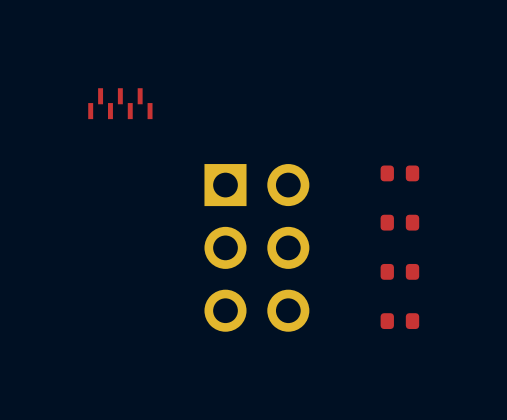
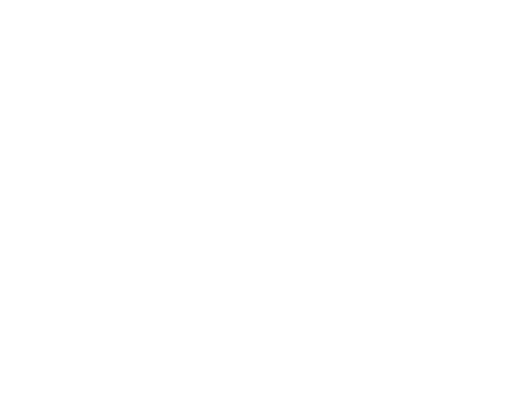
part: (120, 103) -> none
part: (399, 173) -> none
part: (399, 222) -> none
part: (256, 247) -> none
part: (399, 271) -> none
part: (399, 321) -> none

